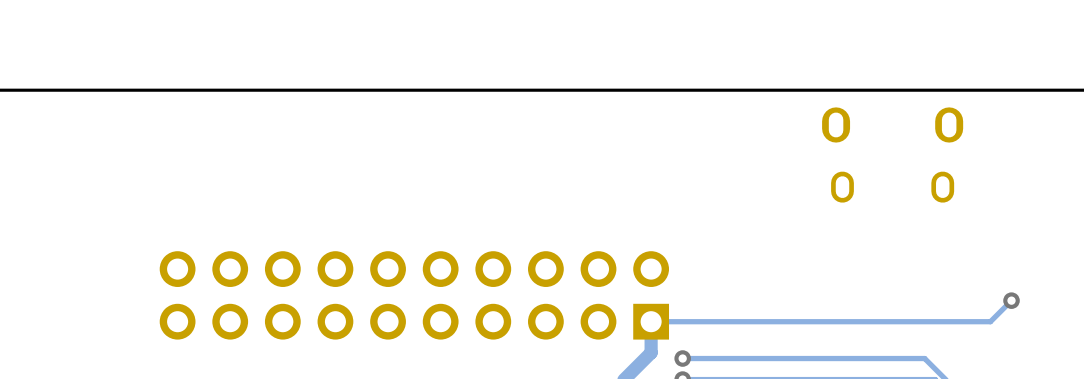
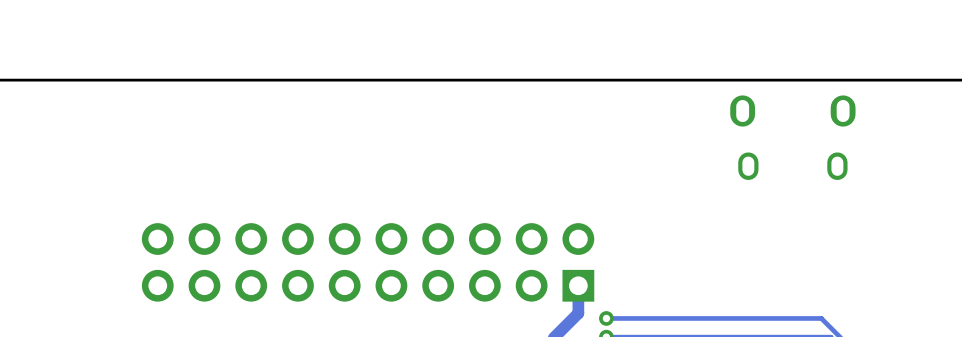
track: (1011, 300) (990, 321) (651, 321) -> none
via: (1011, 300) -> none

